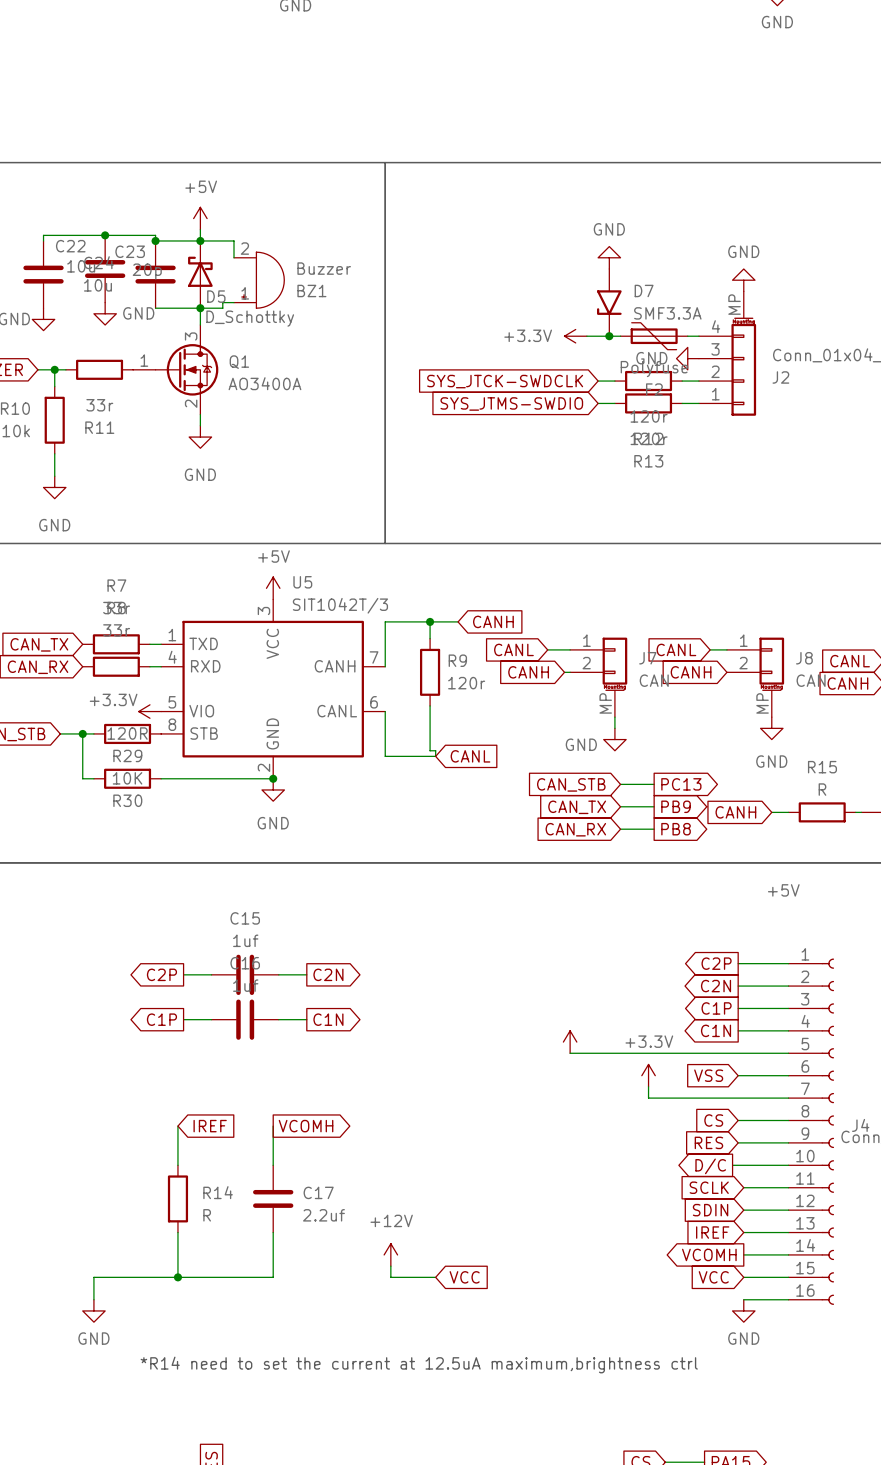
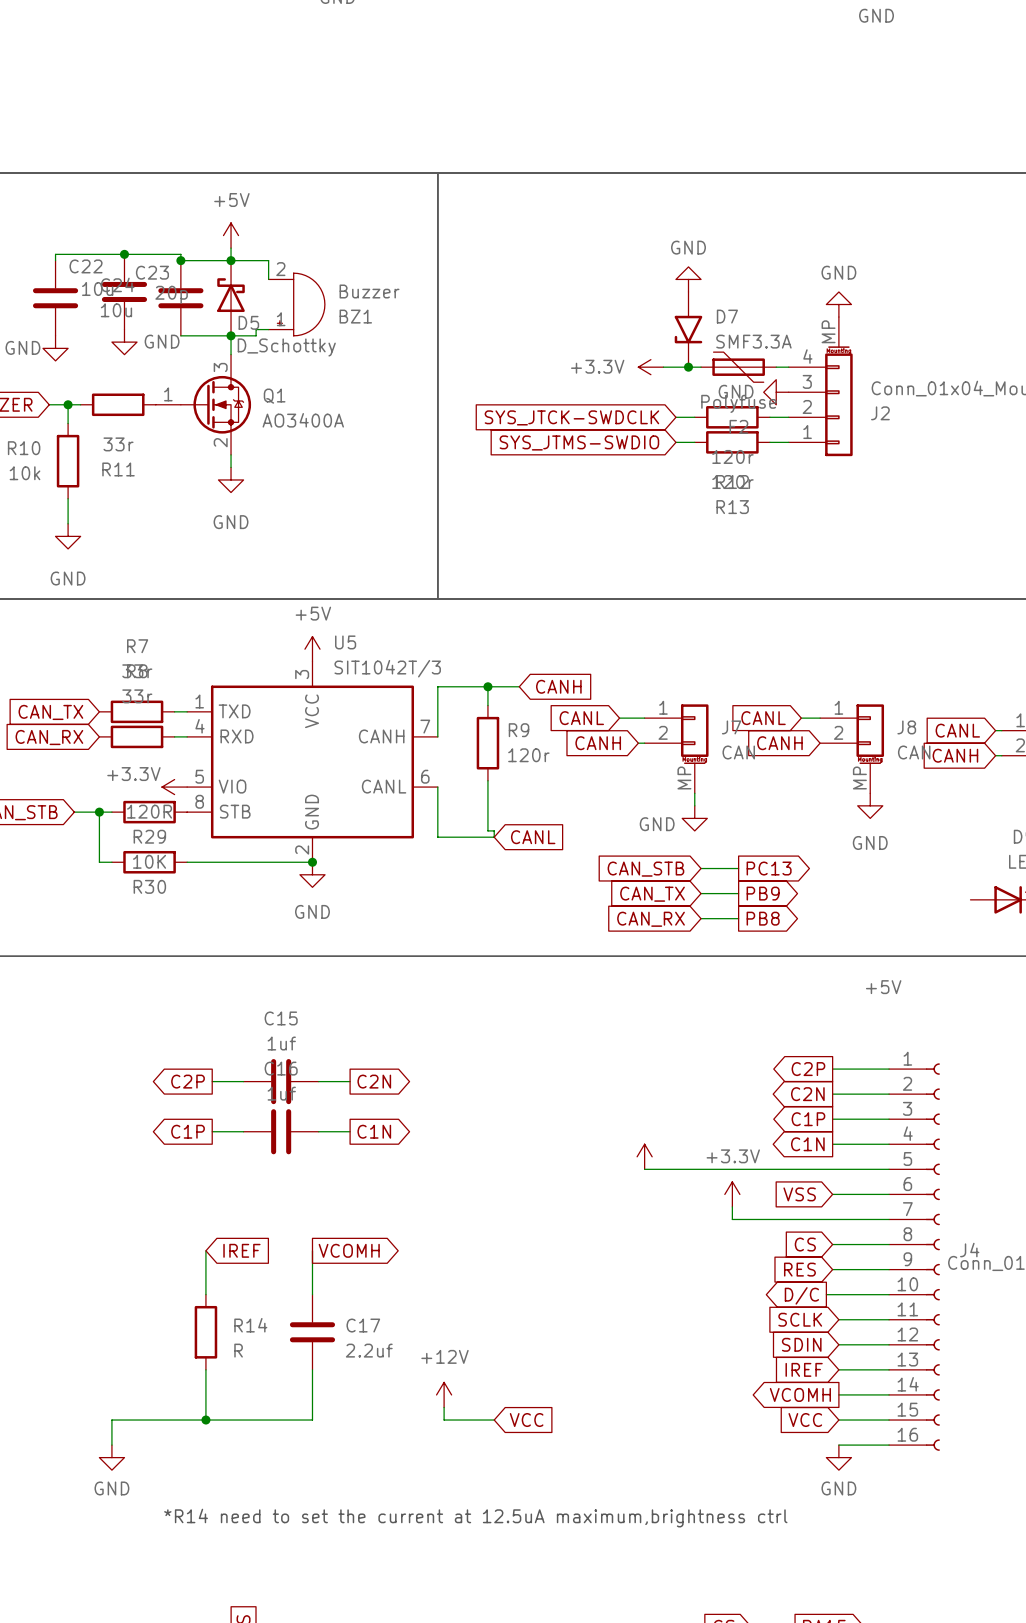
global label: CANH (735, 812) -> none
wire: (771, 812) (788, 812) -> none
R15: R (822, 812) -> none
wire: (855, 812) (861, 812) -> none

